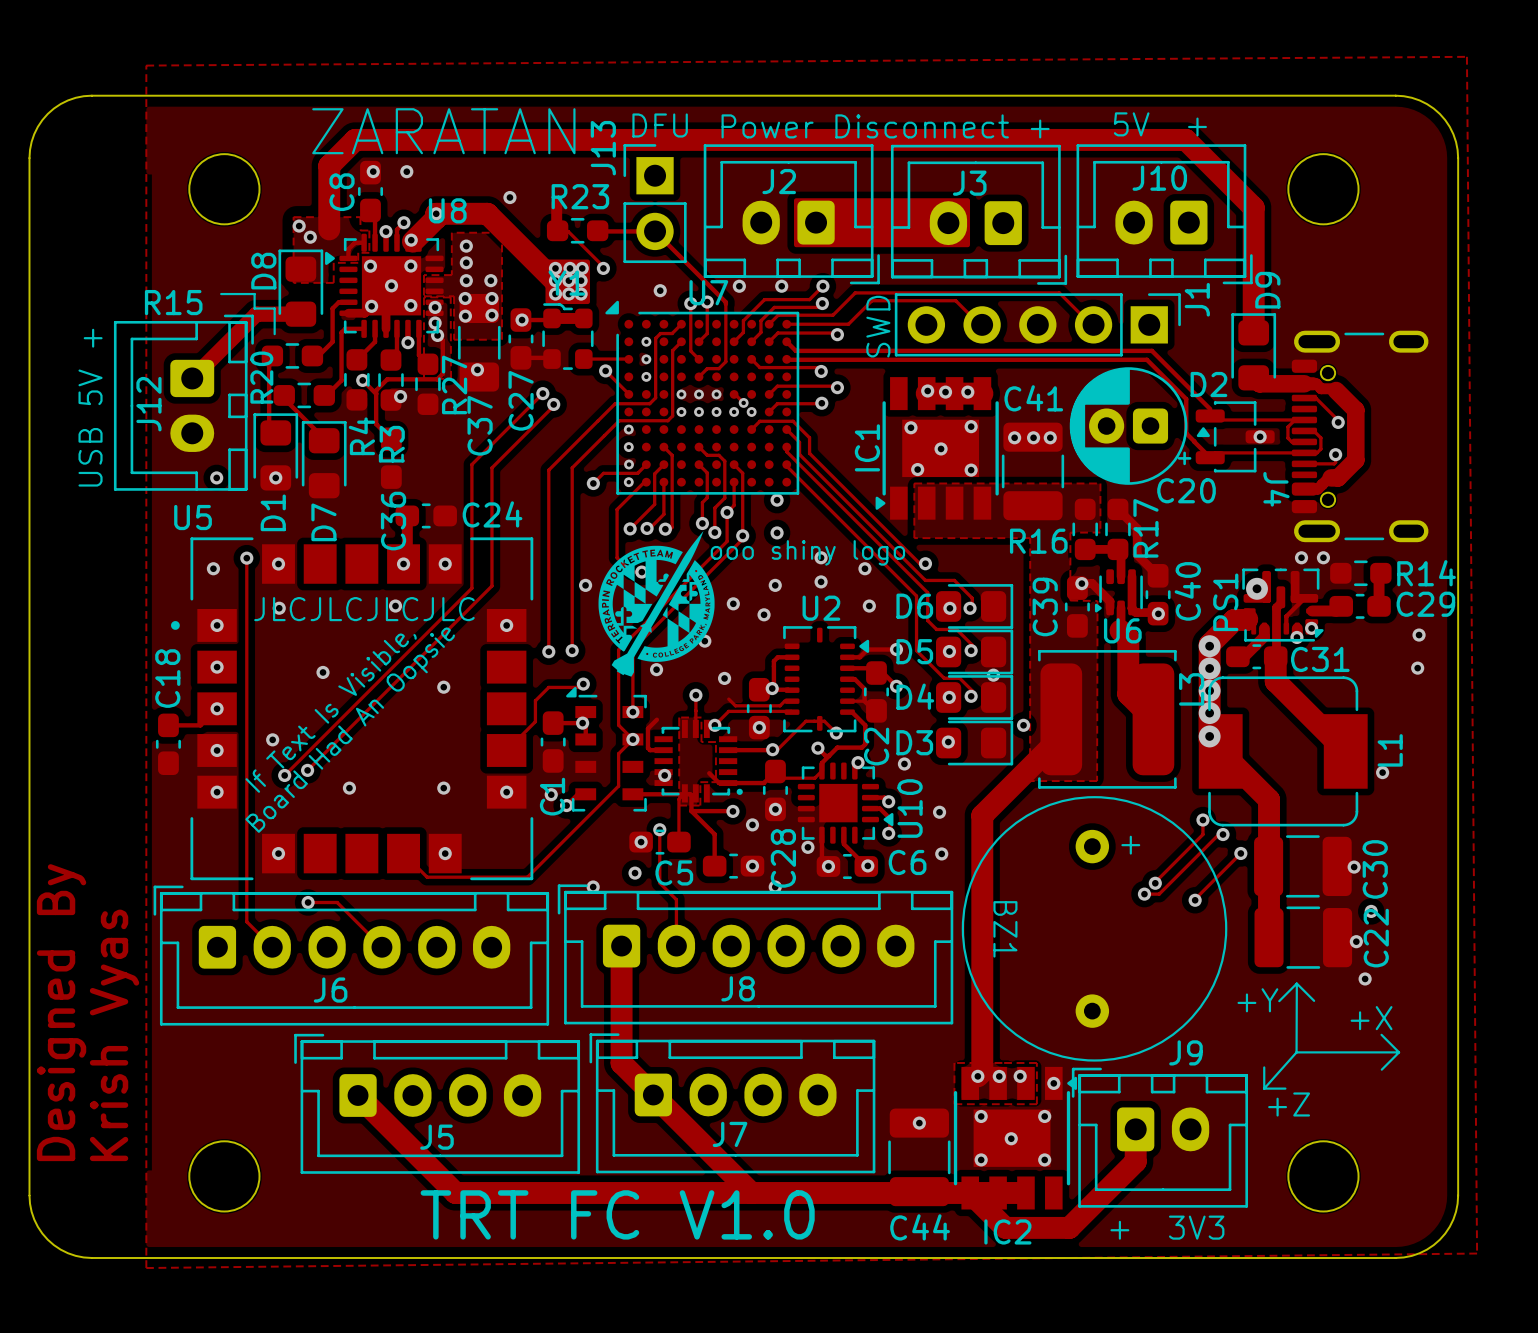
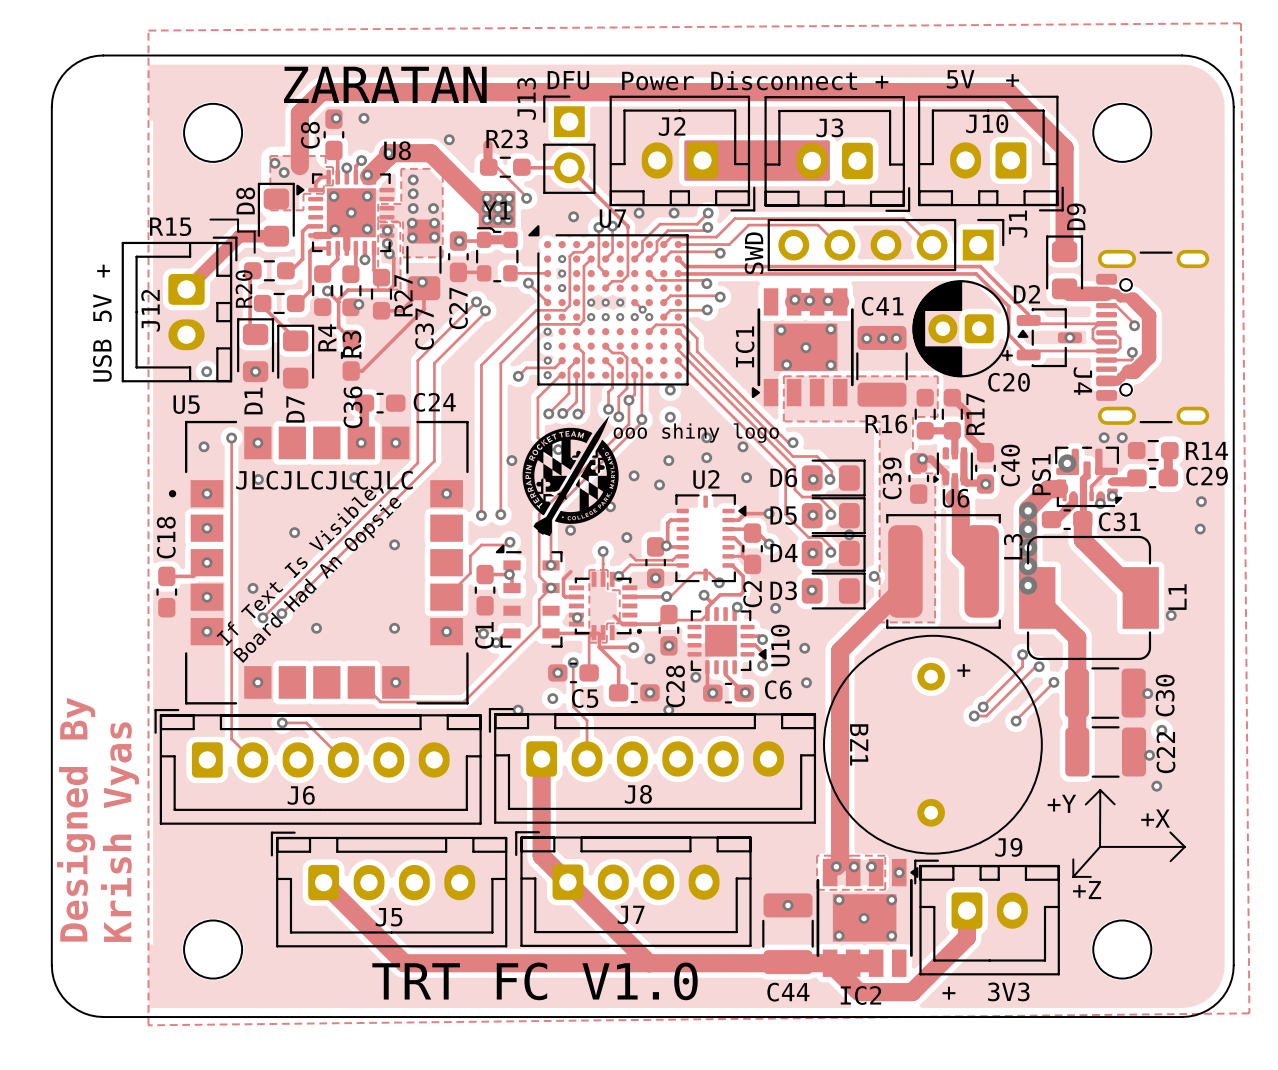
track: none -> (381, 310) (401, 310) (423, 288) (423, 309) (362, 371) (351, 371)

